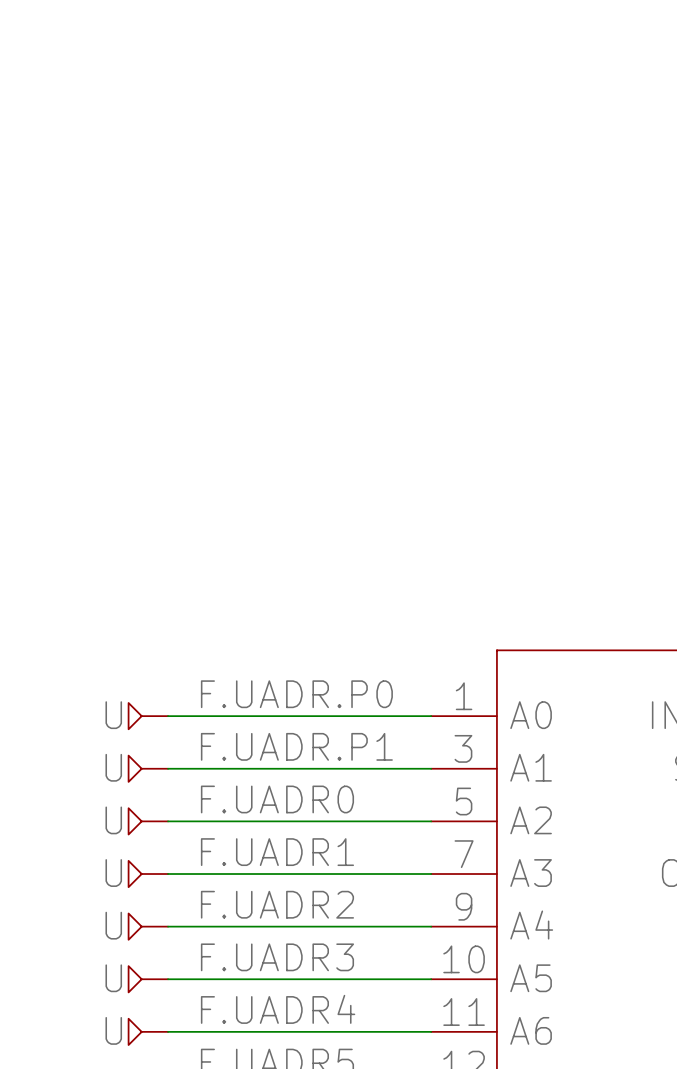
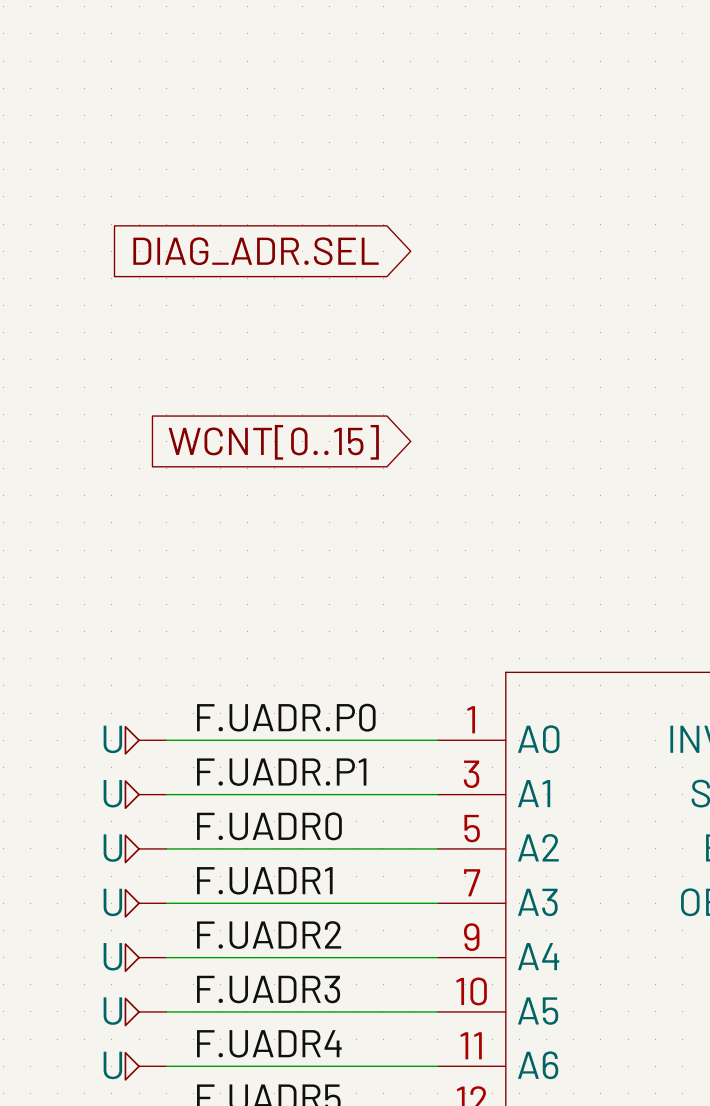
global label: none -> DIAG_ADR.SEL (256, 251)
global label: none -> WCNT[0..15] (273, 442)

